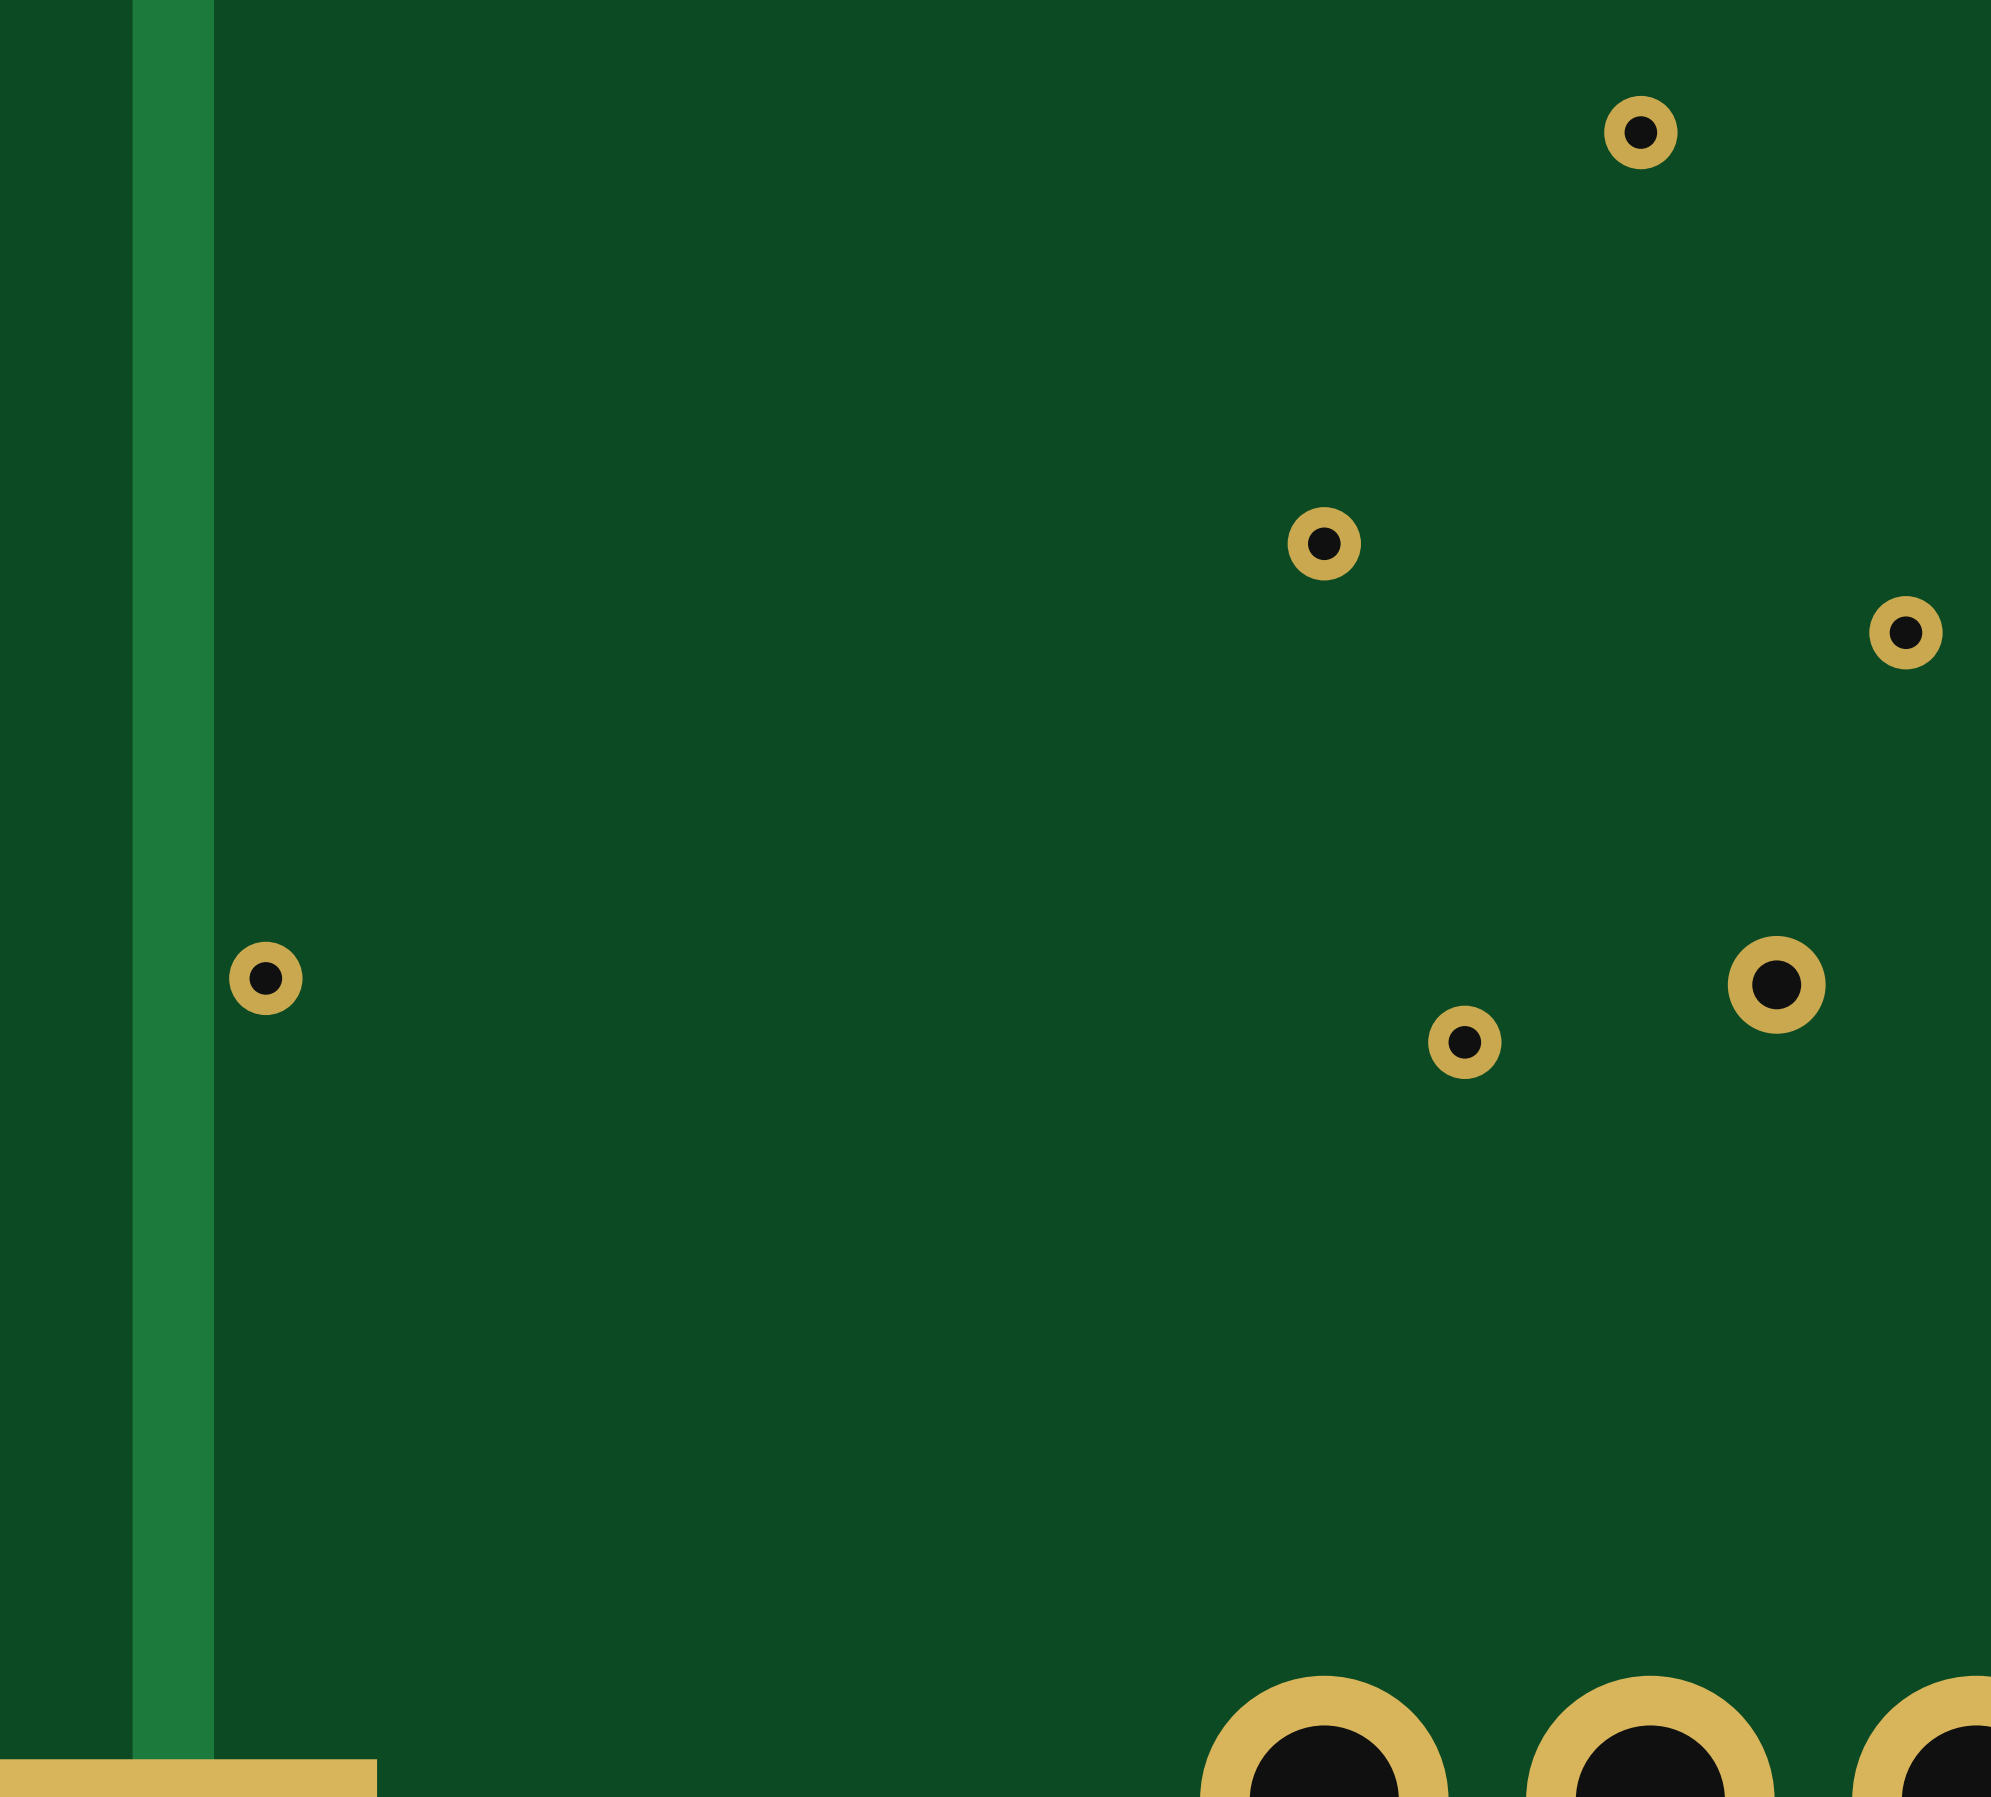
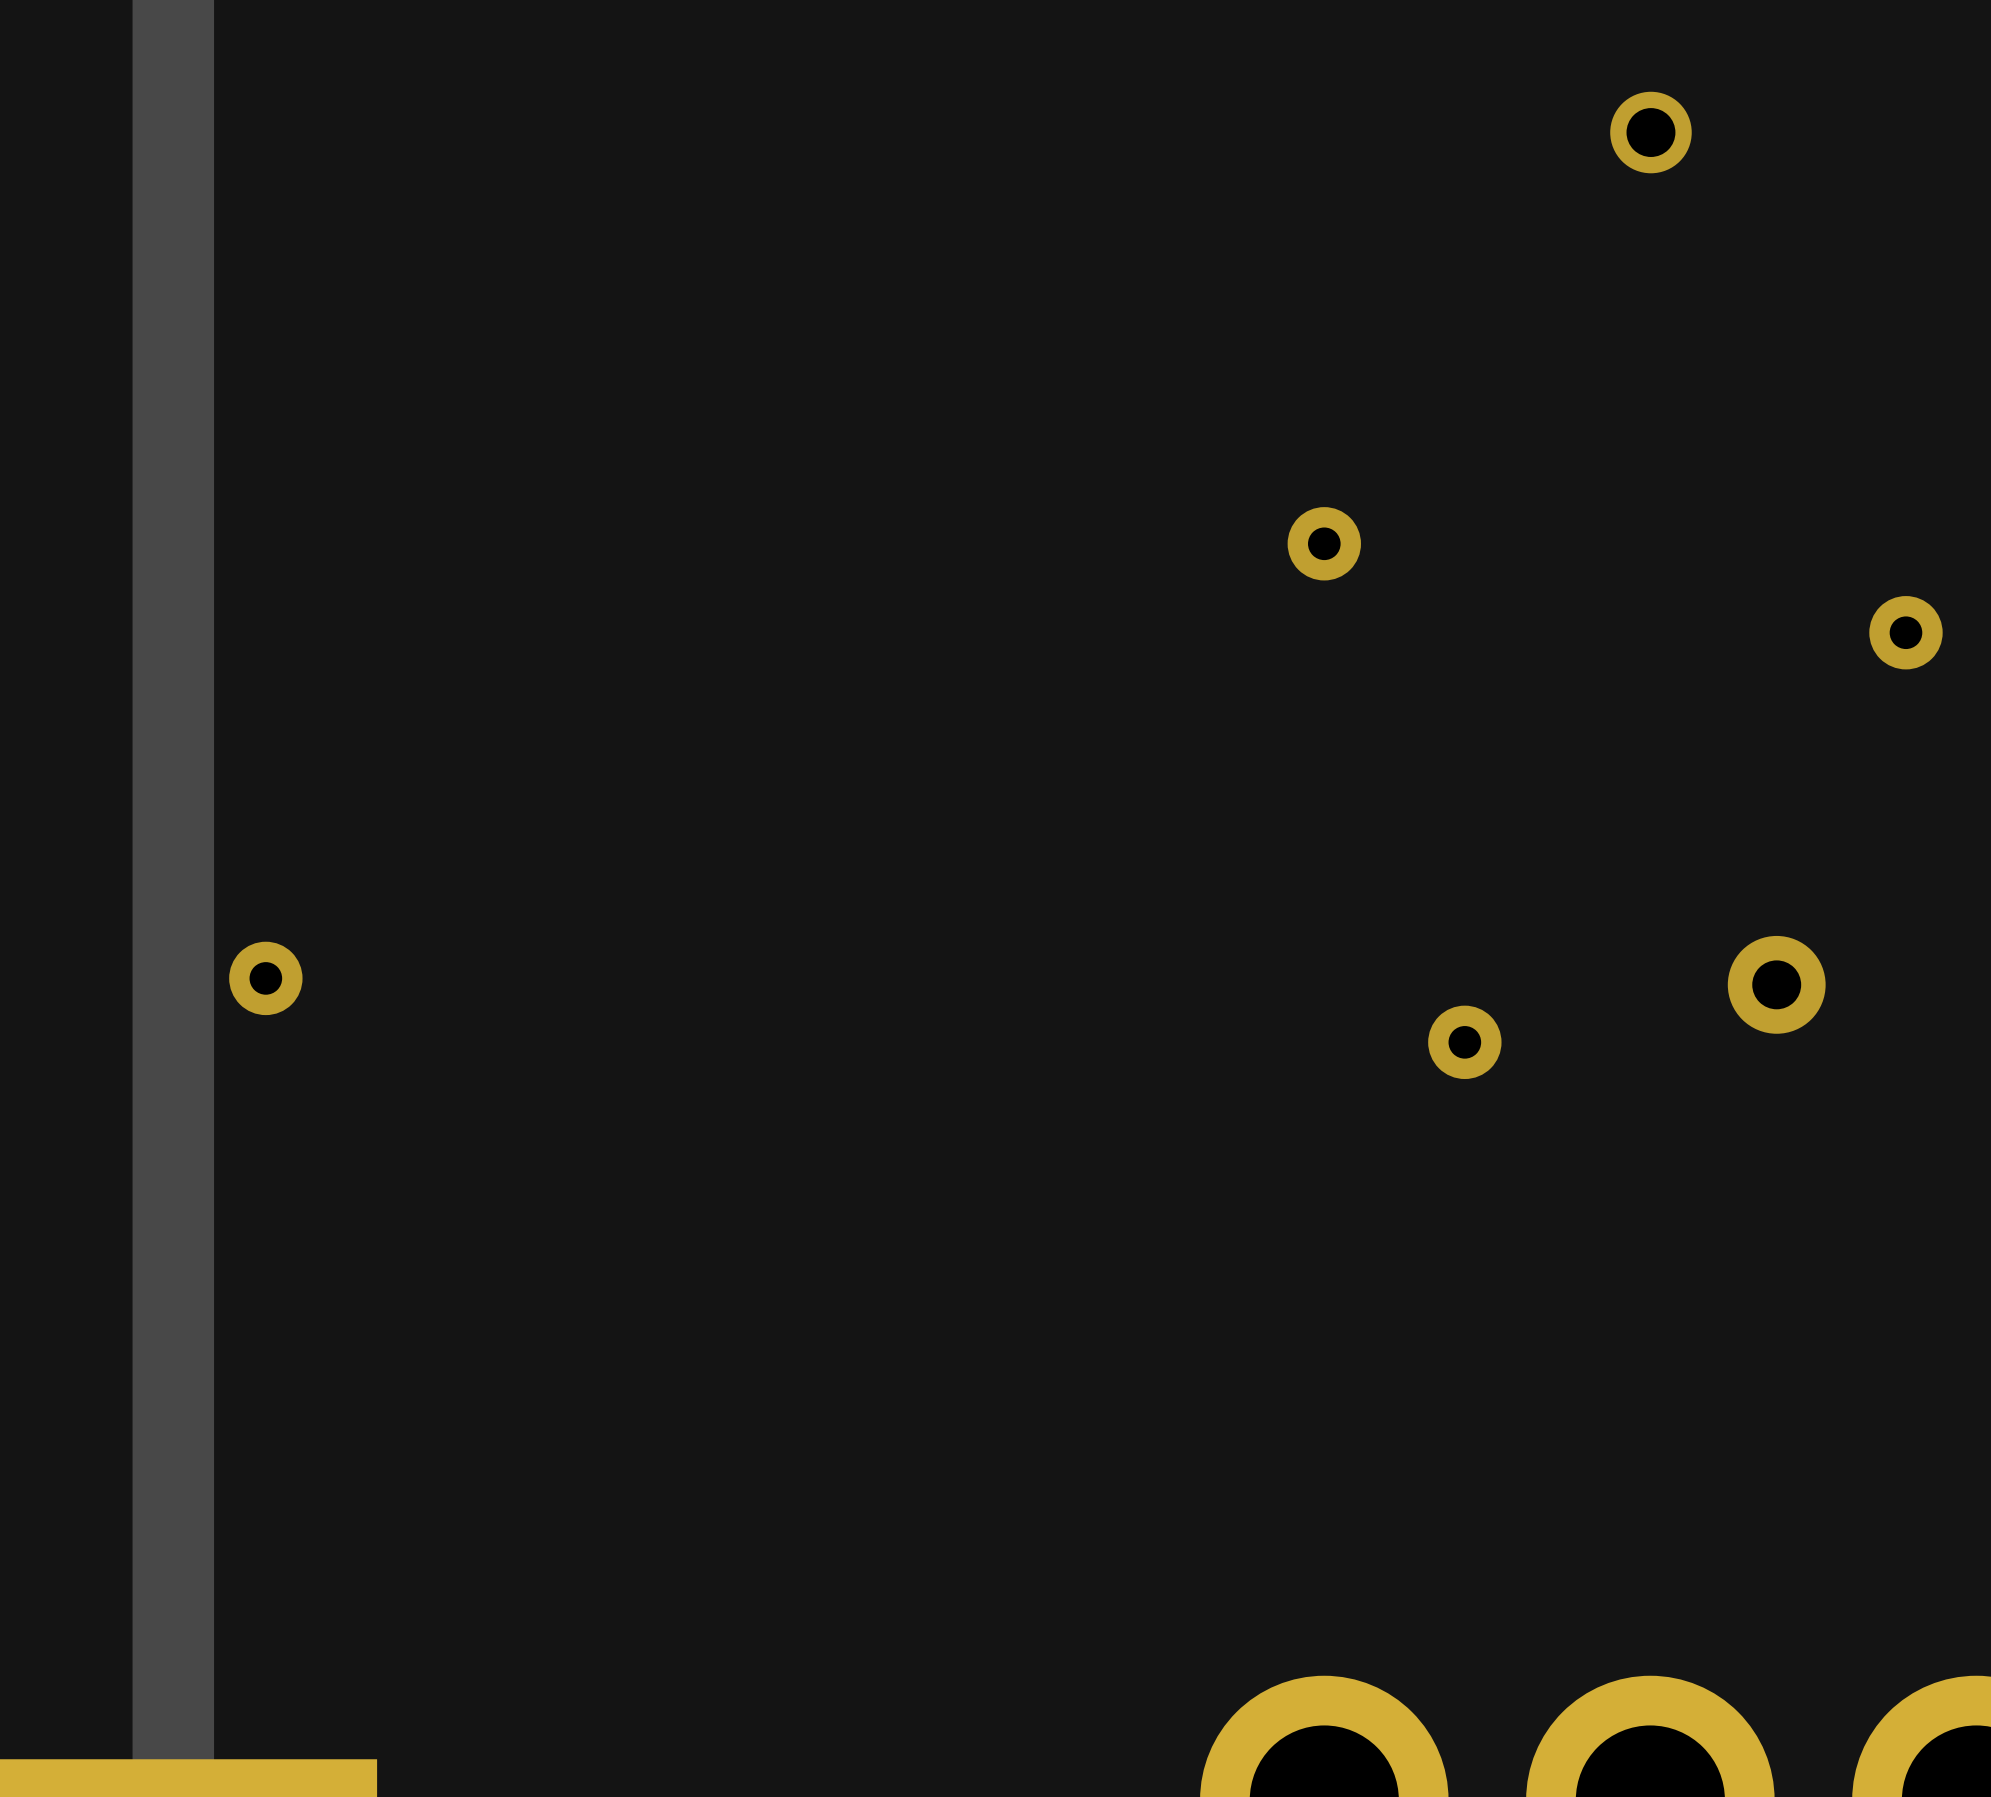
via size: [1604, 95, 1678, 170] -> [1610, 91, 1692, 174]

